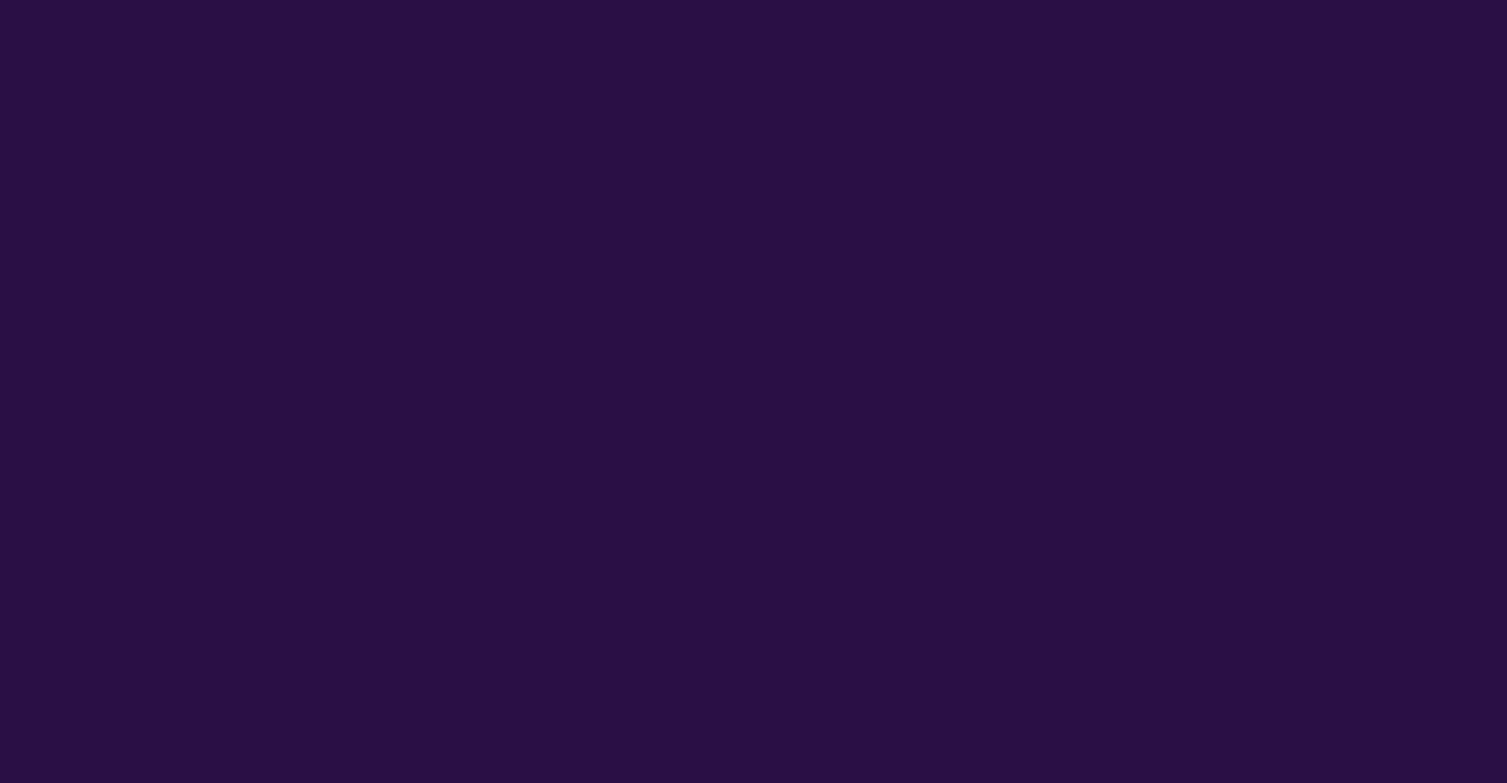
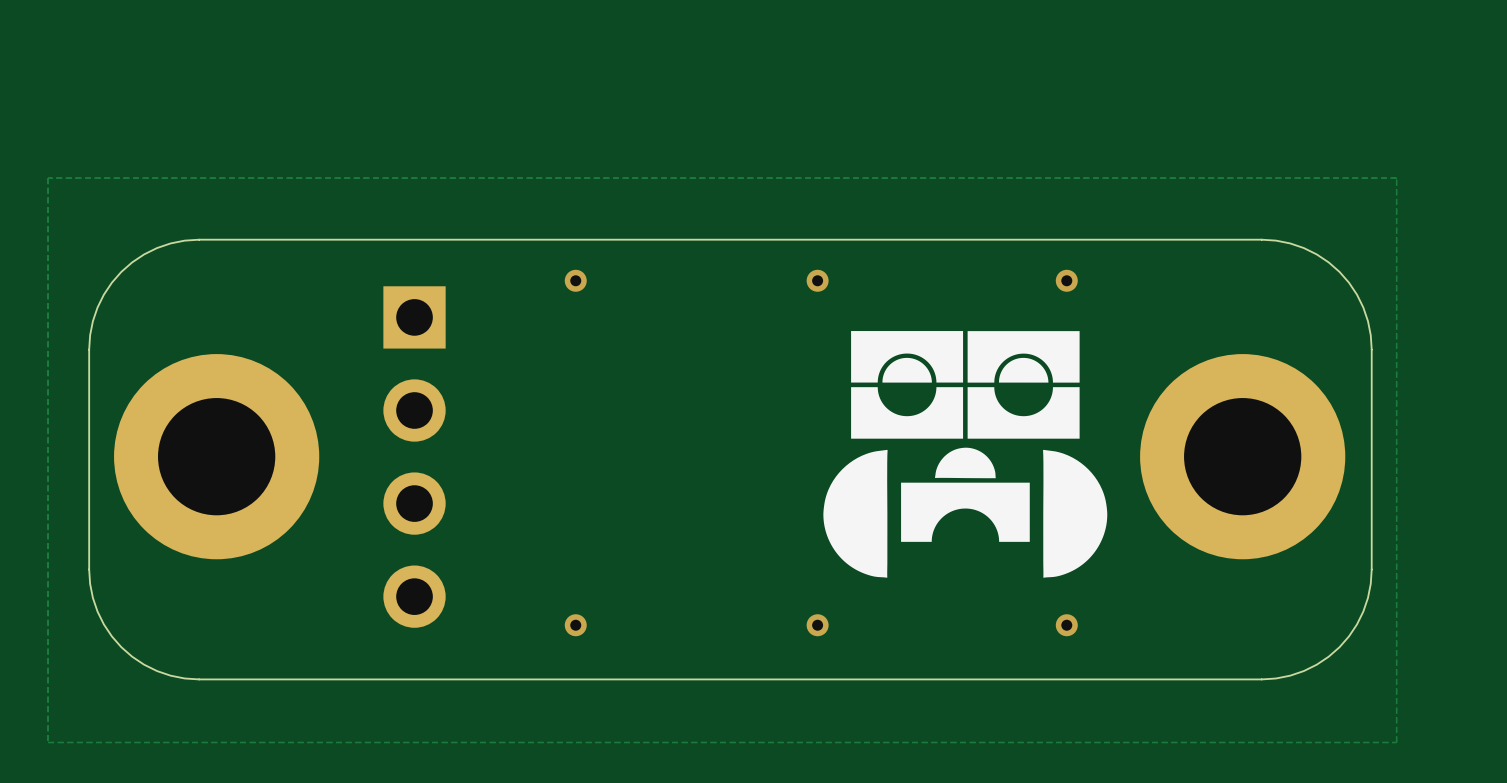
zone outline: none -> (1396, 178) (48, 178) (48, 742) (1396, 742) (1396, 178)
board edge: none -> (1261, 239) (199, 239) (170, 243) (144, 254) (121, 271) (103, 294) (92, 321) (89, 349) (89, 569) (92, 597) (103, 624) (121, 647) (132, 656) (157, 671) (170, 675) (199, 679) (1261, 679) (1290, 675) (1316, 664) (1339, 647) (1356, 624) (1367, 597) (1371, 569) (1371, 349) (1370, 335) (1363, 307) (1356, 294) (1339, 271) (1328, 262) (1303, 248) (1290, 243) (1261, 239)
via: none -> (575, 280)
via: none -> (817, 280)
via: none -> (1066, 280)
drawing: none -> [823, 331, 1108, 578]
part: none -> (216, 456)
part: none -> (1242, 456)
part: none -> (414, 457)
via: none -> (575, 625)
via: none -> (817, 625)
via: none -> (1066, 625)

